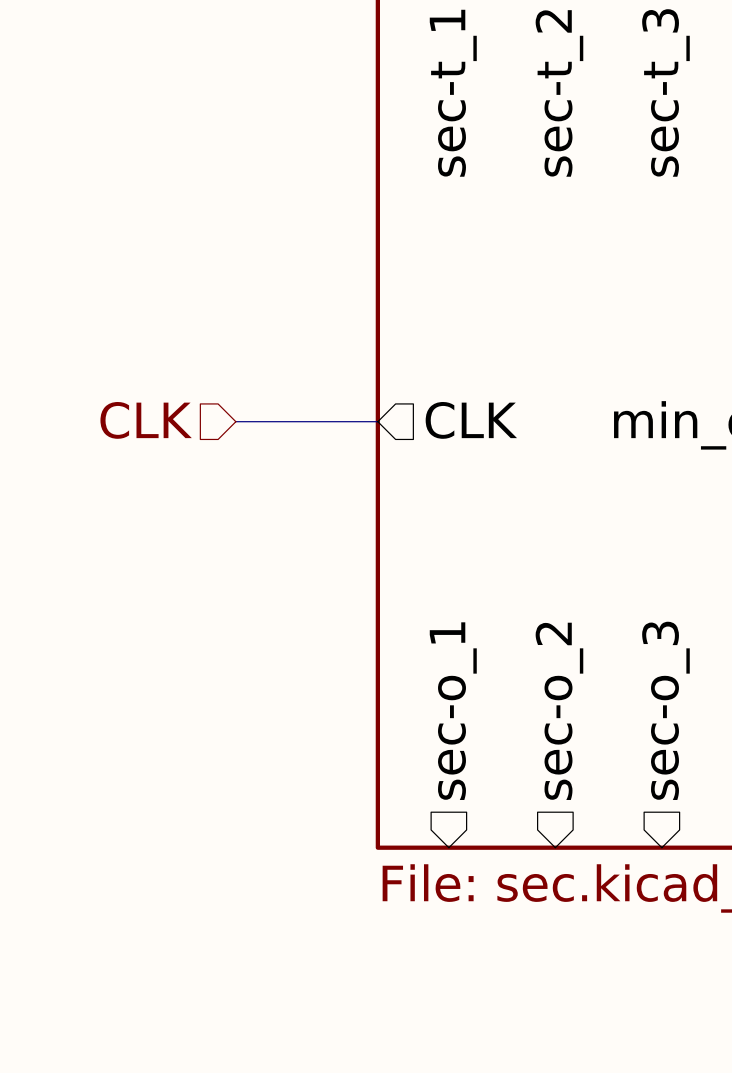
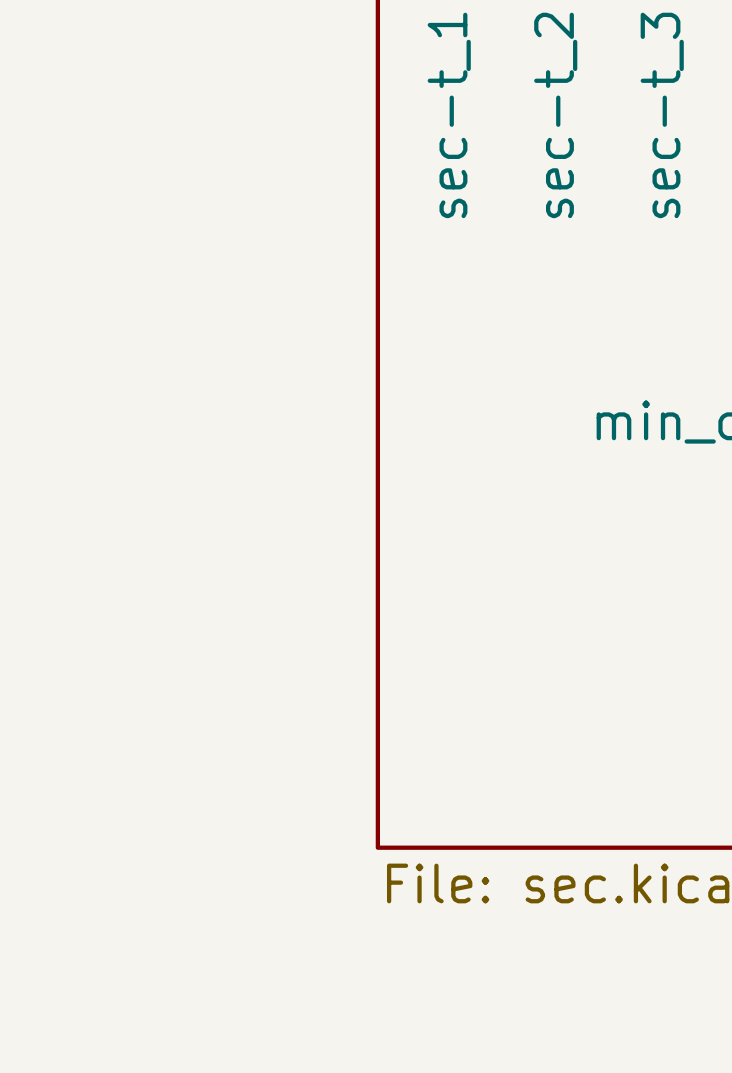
hierarchical label: CLK (146, 420) -> none
sheet pin: CLK (471, 420) -> none
wire: (235, 421) (377, 421) -> none
sheet pin: sec-o_3 (665, 710) -> none
sheet pin: sec-o_1 (453, 711) -> none
sheet pin: sec-o_2 (559, 711) -> none

